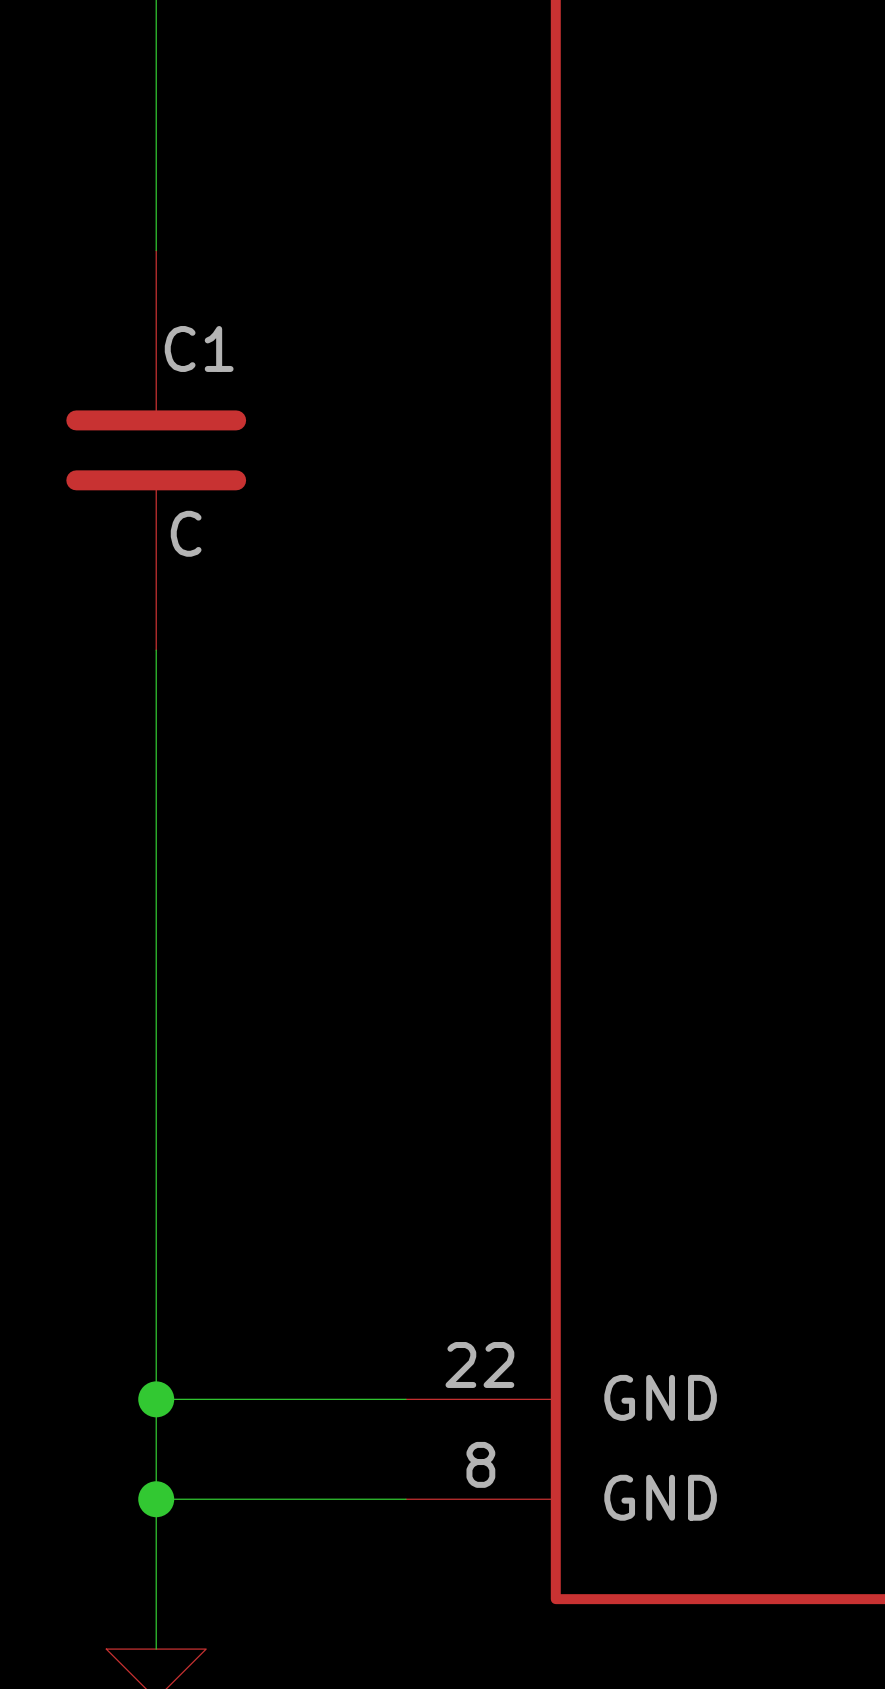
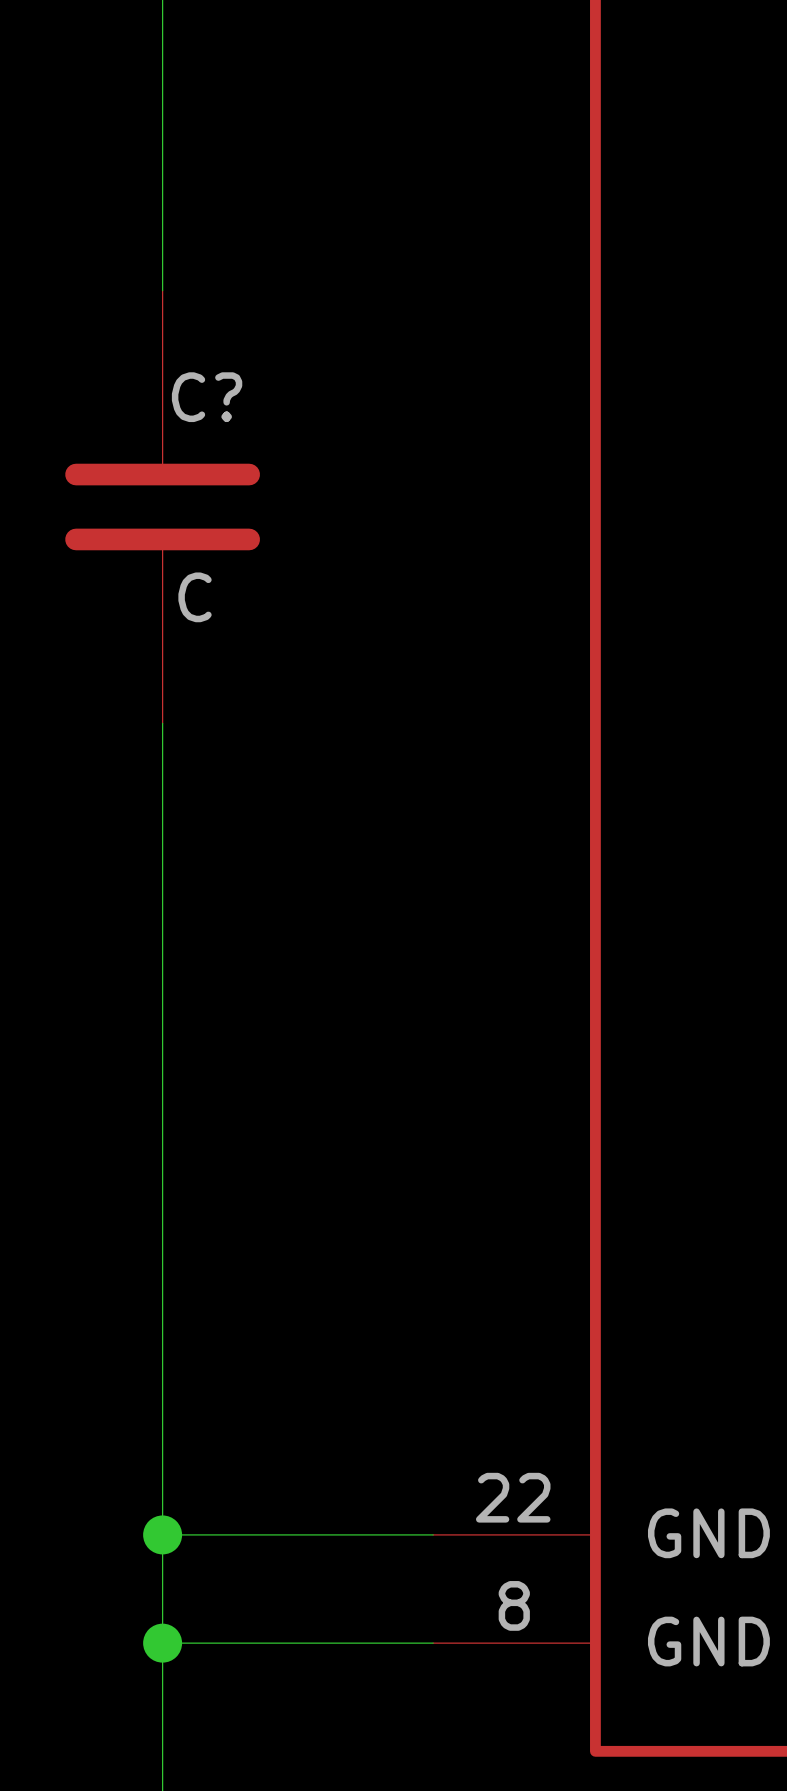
C1 name: C1 (199, 348) -> C? (207, 397)

